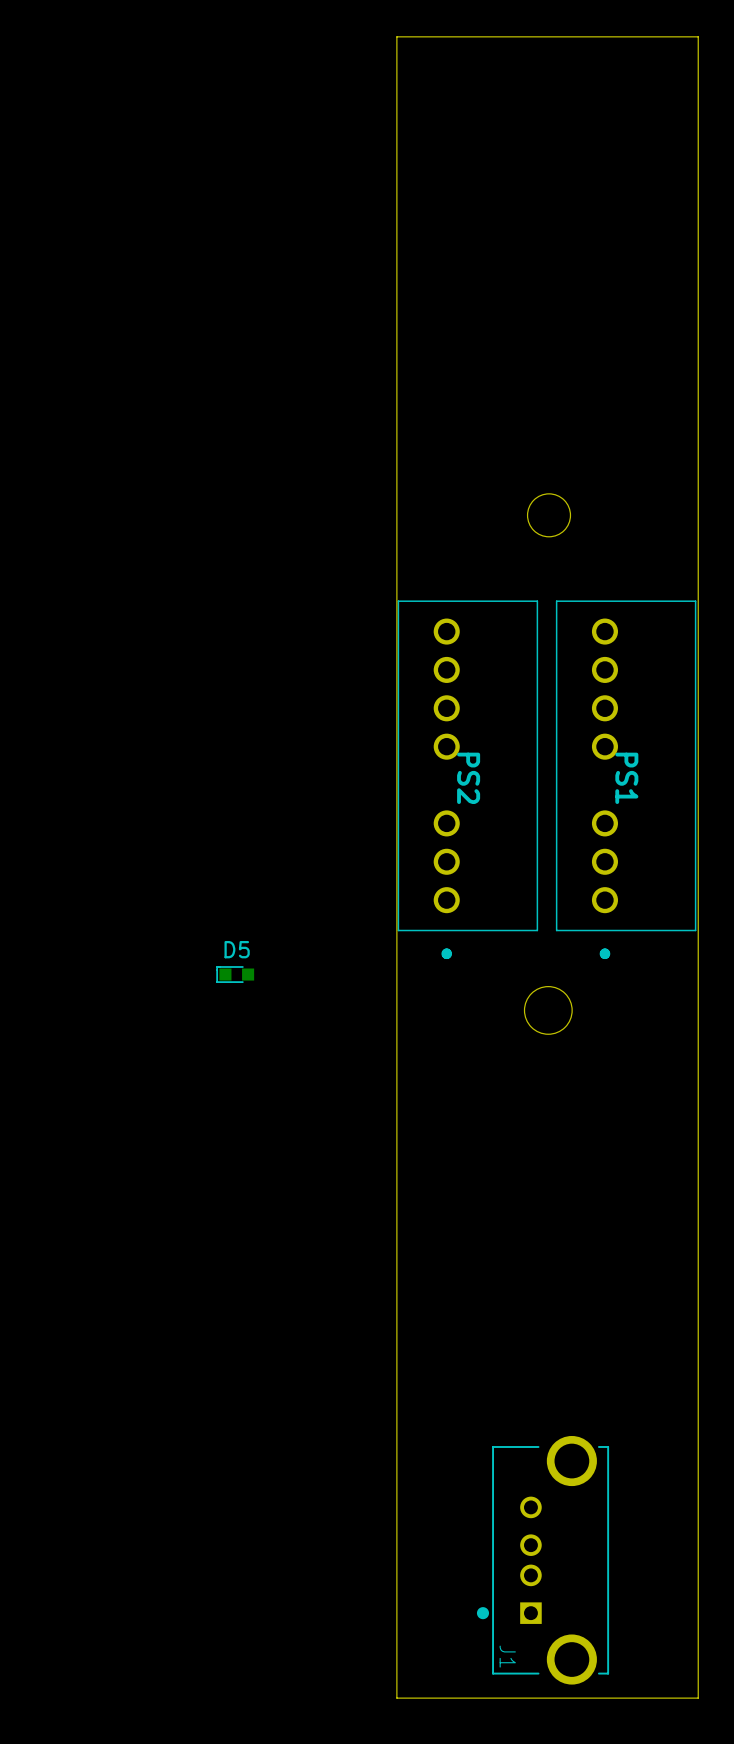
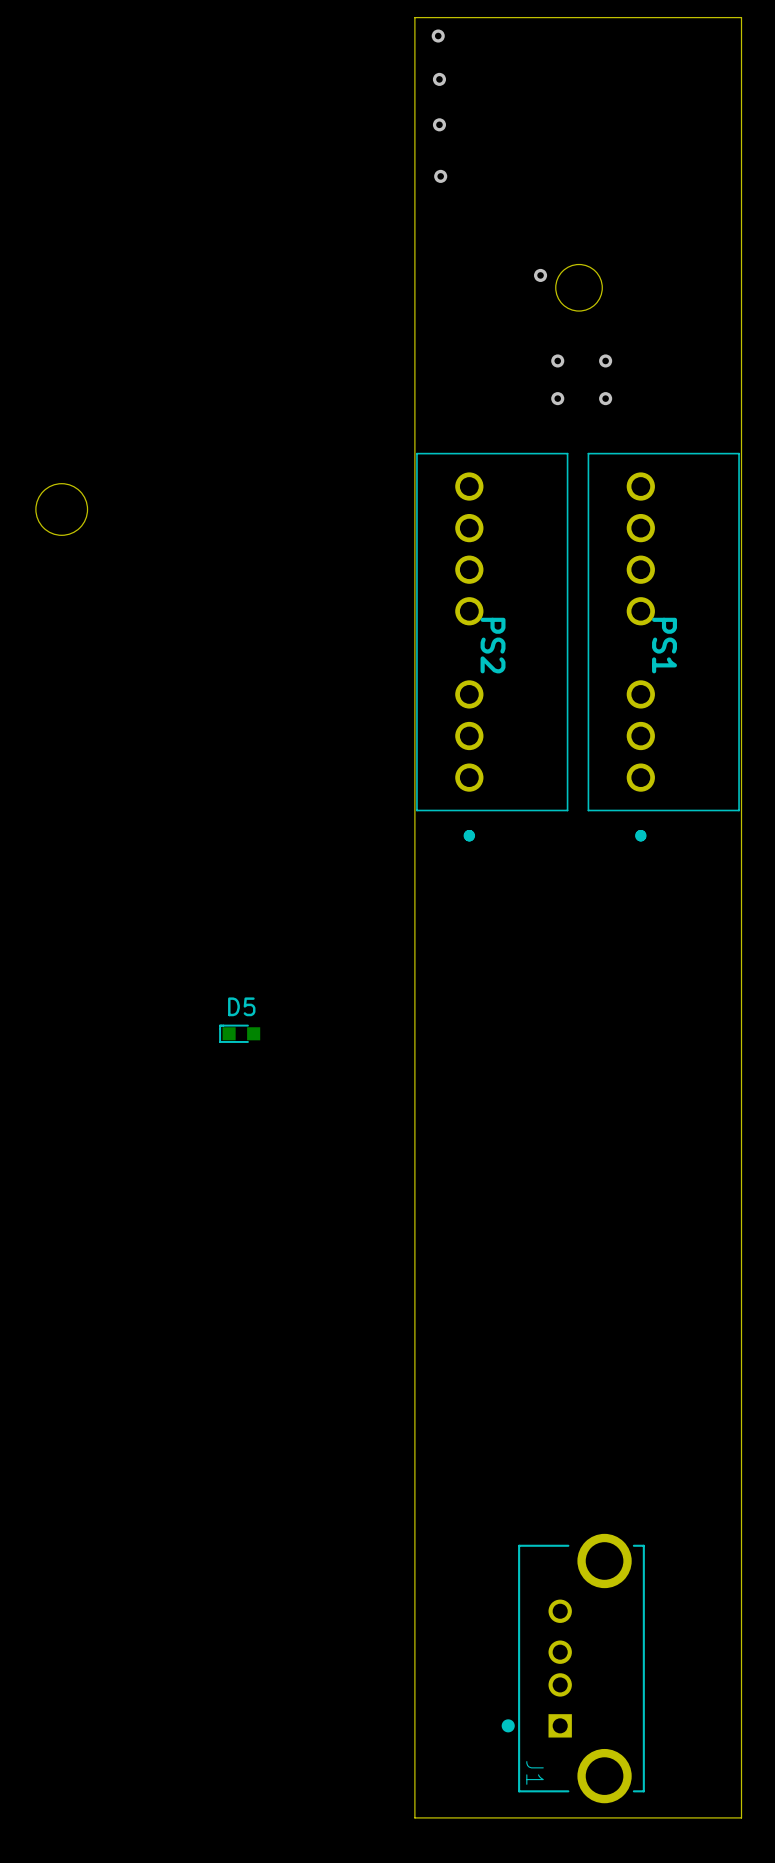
via: none -> (438, 36)
via: none -> (439, 79)
via: none -> (439, 124)
via: none -> (440, 176)
via: none -> (540, 275)
via: none -> (557, 360)
via: none -> (605, 360)
via: none -> (557, 398)
via: none -> (605, 398)
round board edge: none -> [35, 483, 88, 536]
round board edge position: (549, 515) -> (579, 287)
PS2 position: (467, 779) -> (492, 647)
PS1 position: (626, 779) -> (663, 647)
round board edge: [524, 986, 573, 1035] -> none

